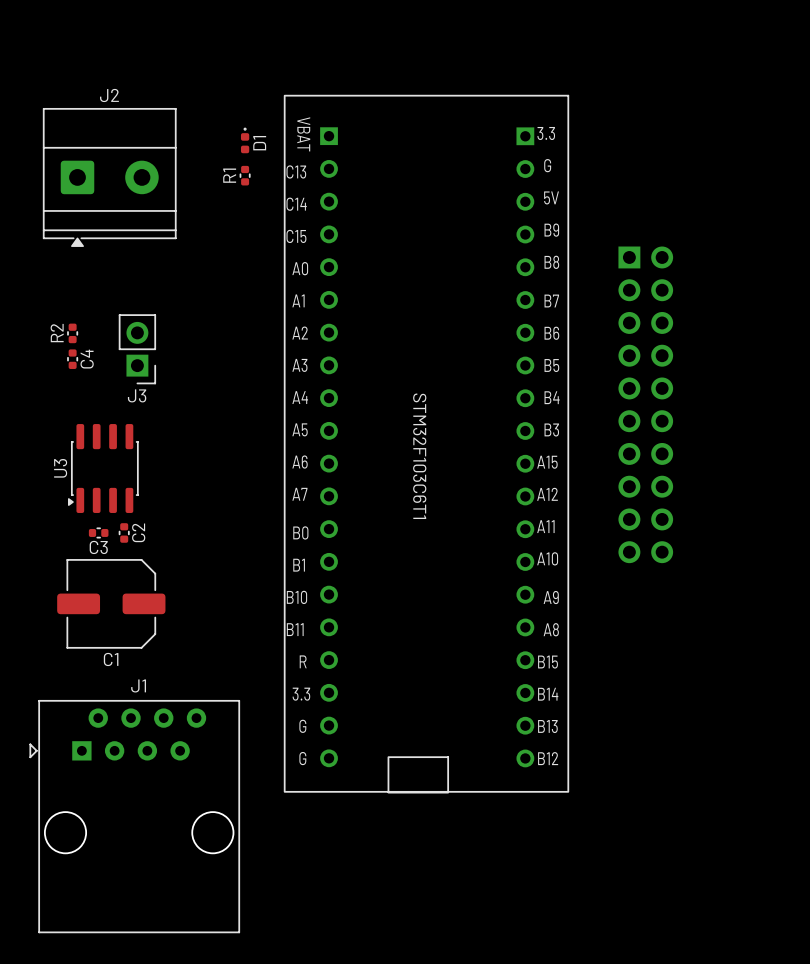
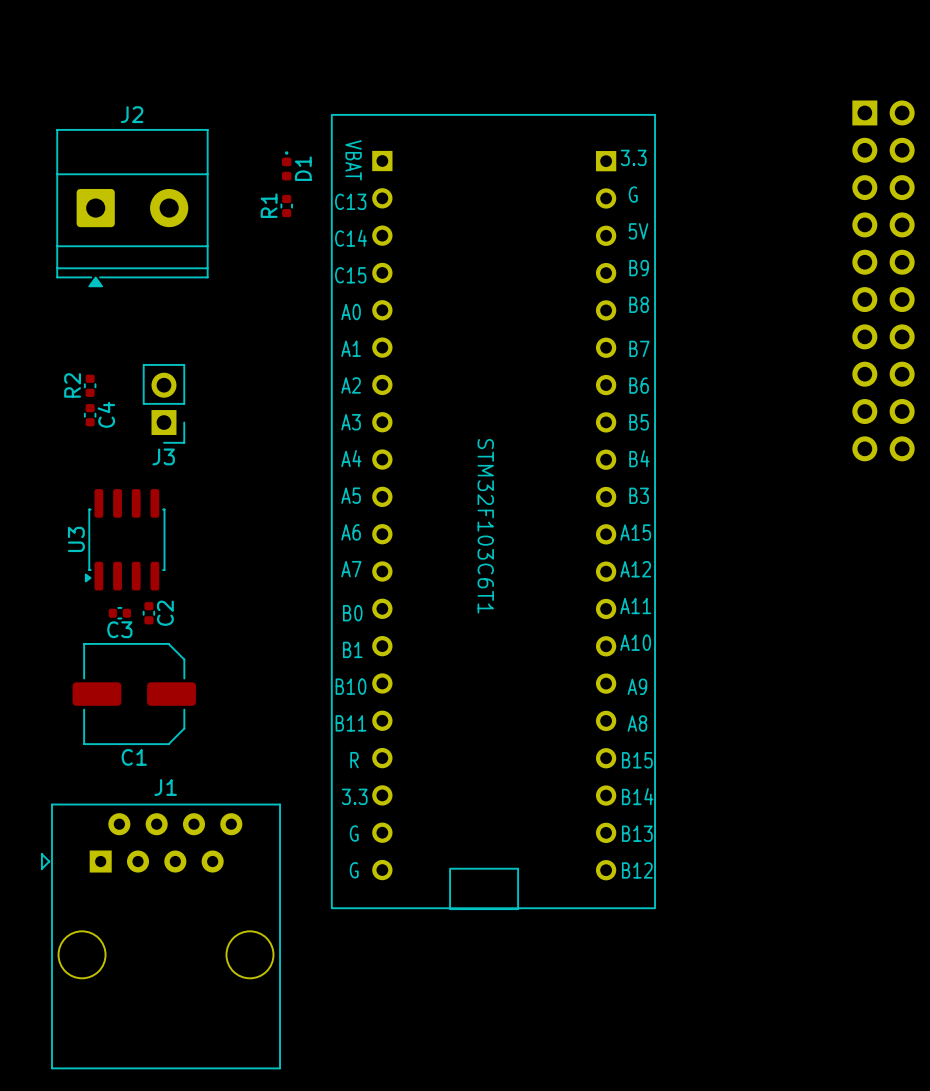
part position: (645, 404) -> (883, 280)

